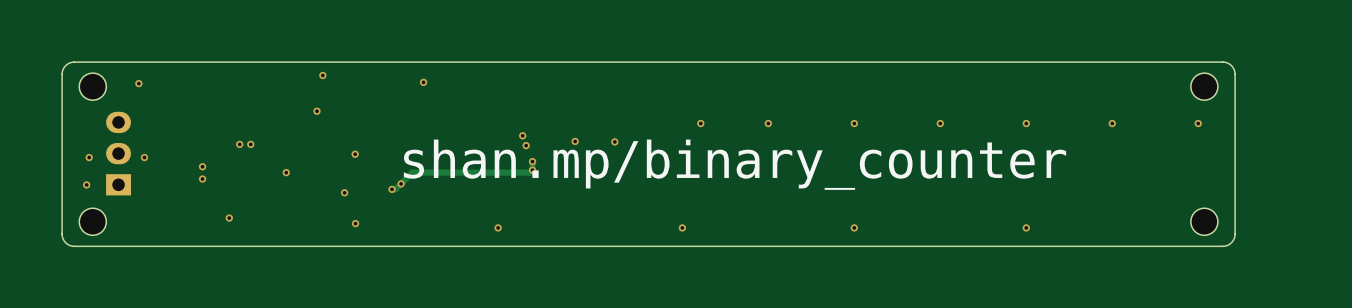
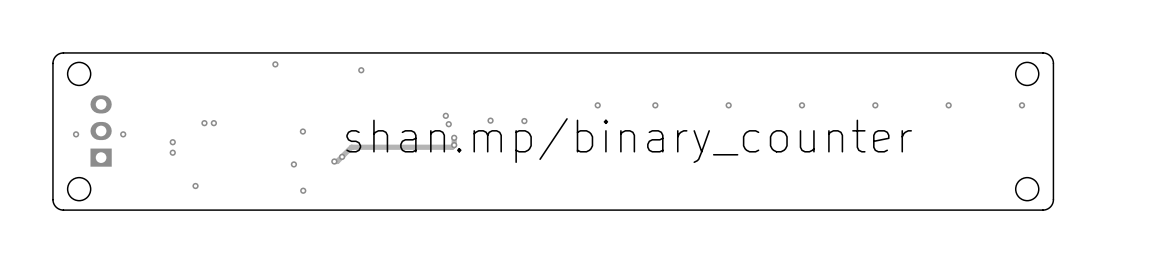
via: (138, 83) -> none
via: (316, 111) -> none
via: (286, 172) -> none
via: (86, 184) -> none
via: (498, 227) -> none
via: (682, 227) -> none
via: (854, 227) -> none
via: (1026, 227) -> none

